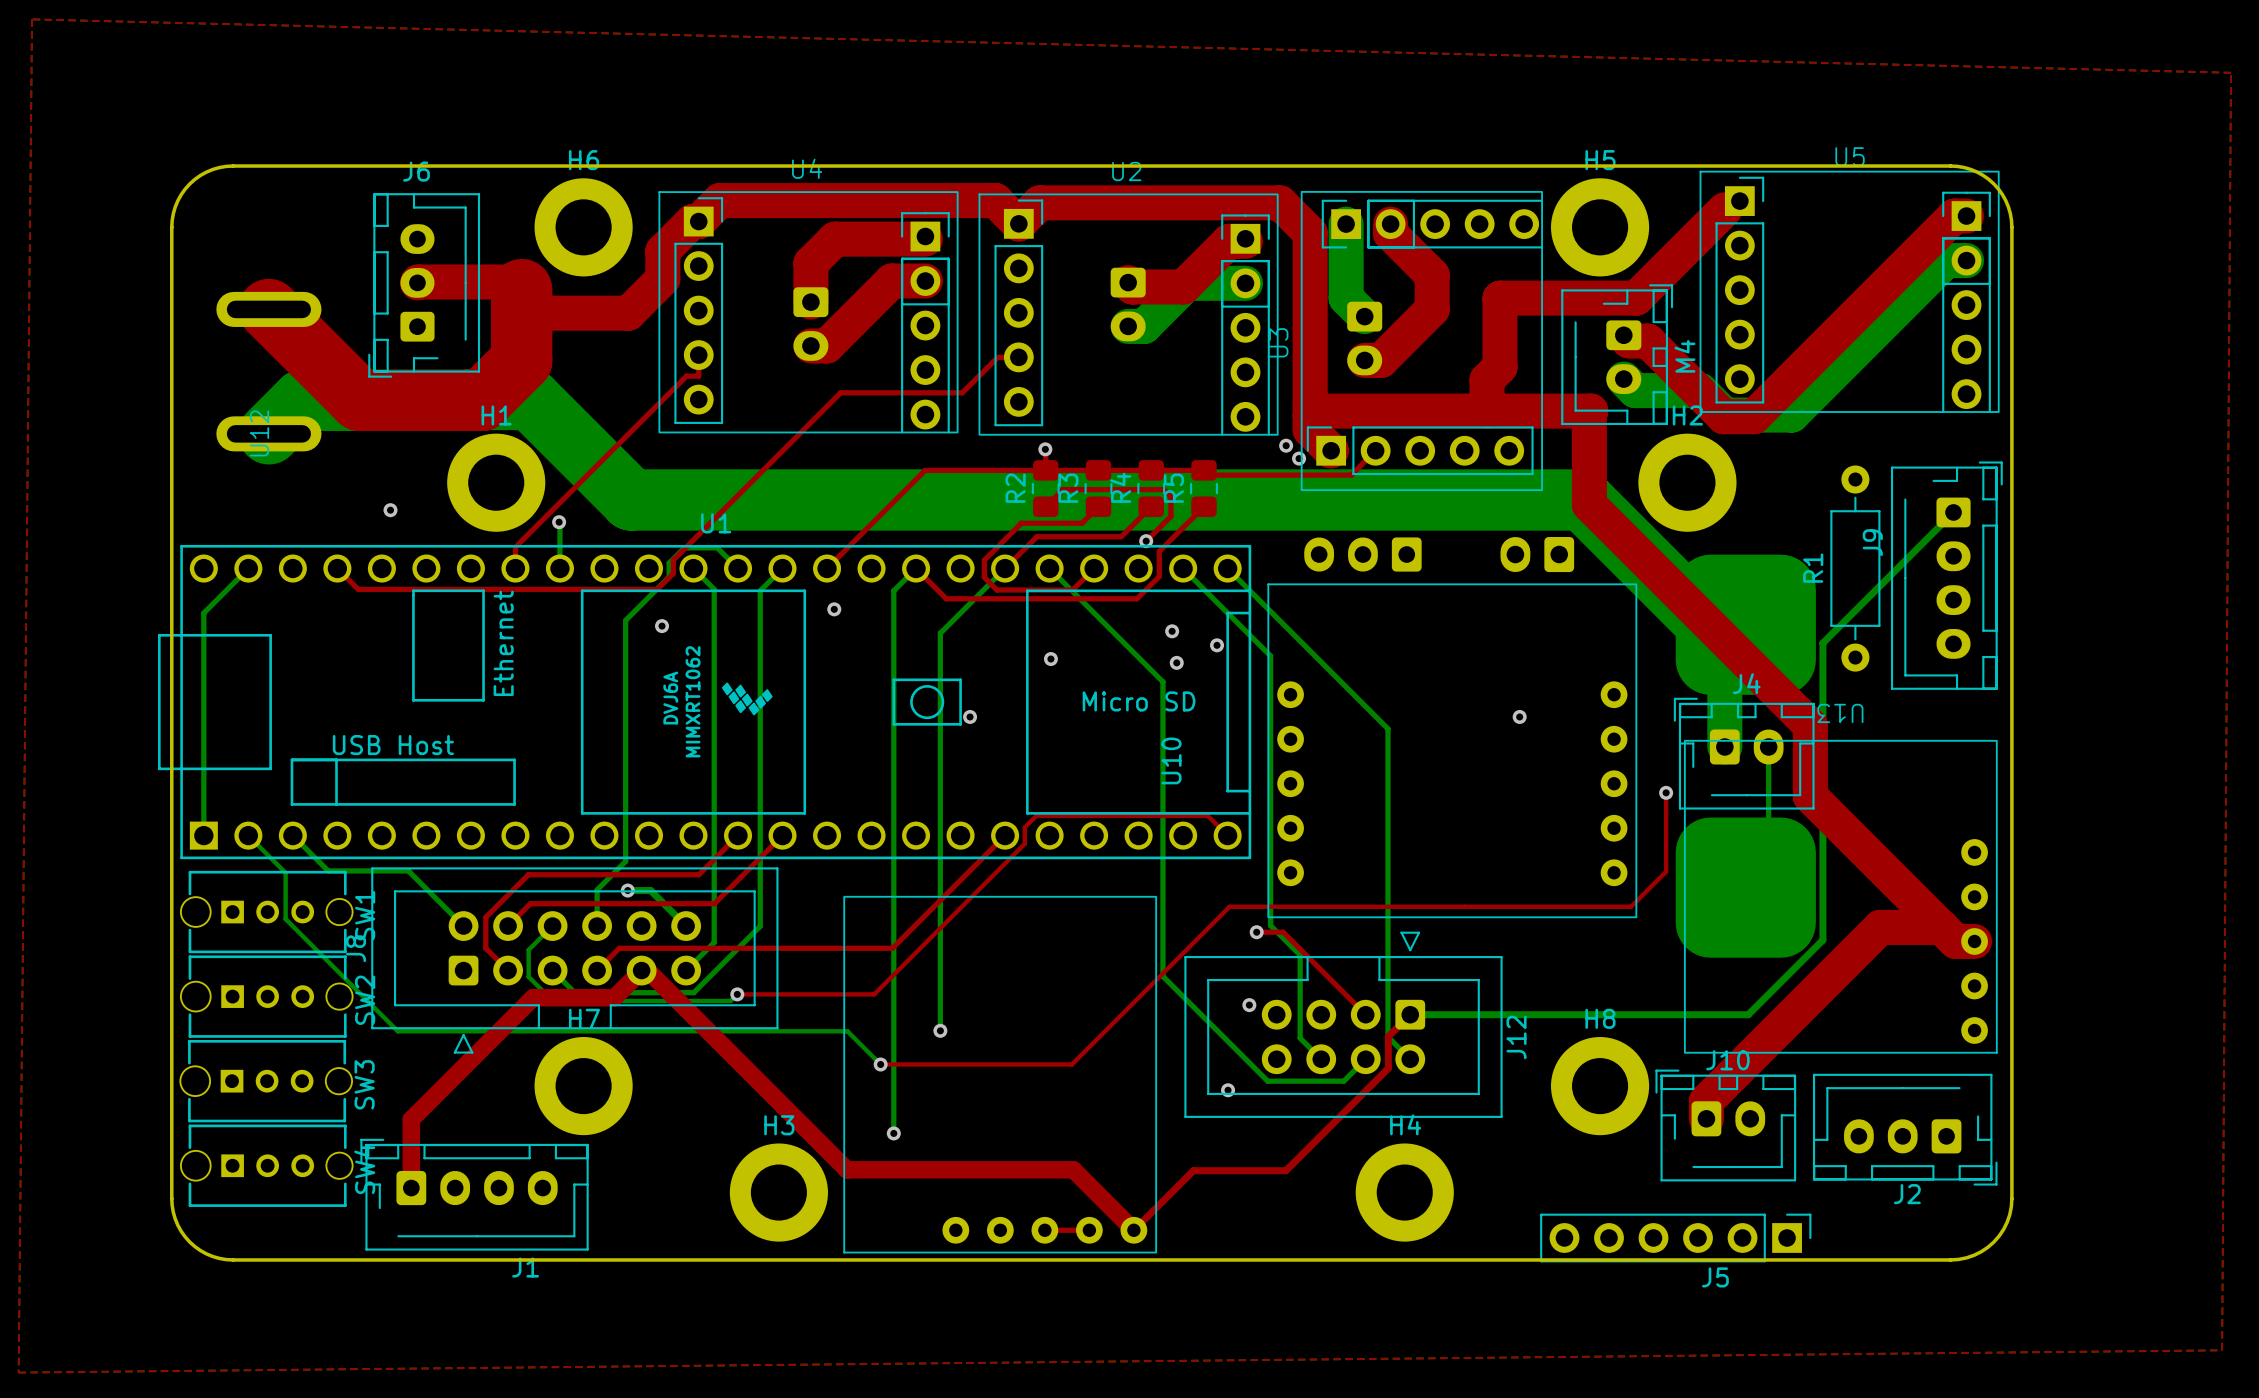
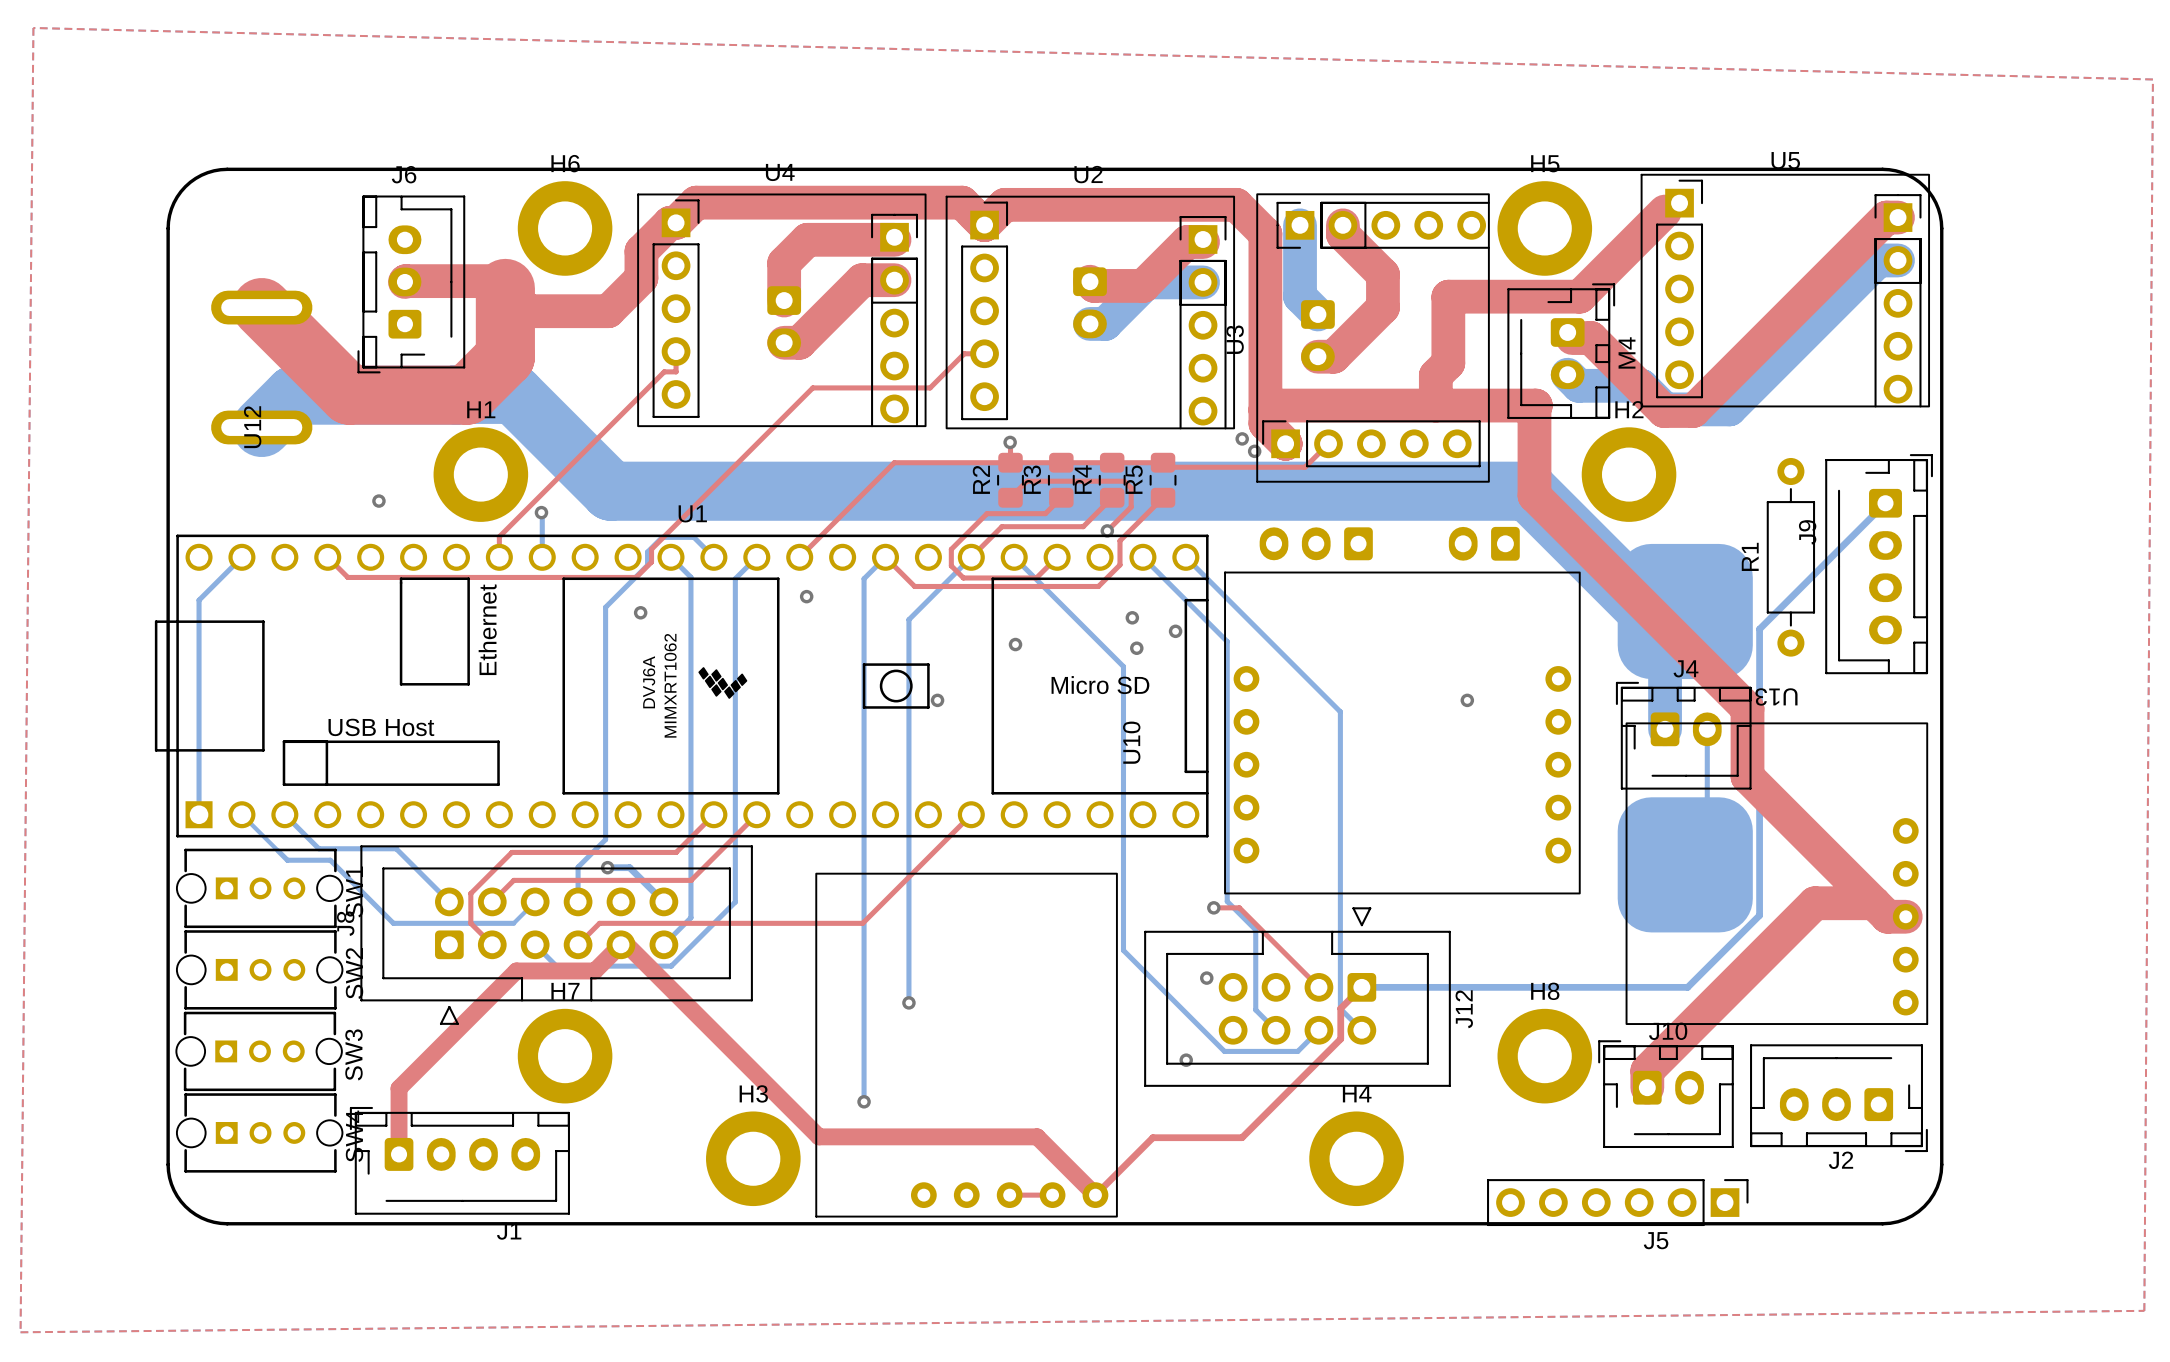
top track: (1666, 792) (1666, 871) (1631, 906) (1229, 906) (1071, 1064) (880, 1064) -> none
via: (1666, 792) -> none
top track: (1227, 835) (1207, 815) (1036, 815) (1024, 827) (1024, 843) (874, 994) (737, 994) -> none
bottom track: (285, 872) (285, 919) (397, 1031) (847, 1031) (880, 1064) -> (277, 850) (287, 860) (330, 860) (393, 923) (513, 923)
bottom track: (530, 948) (528, 949) (528, 976) (552, 1001) (730, 1001) (737, 994) -> none
via: (737, 994) -> none
via: (880, 1064) -> none

